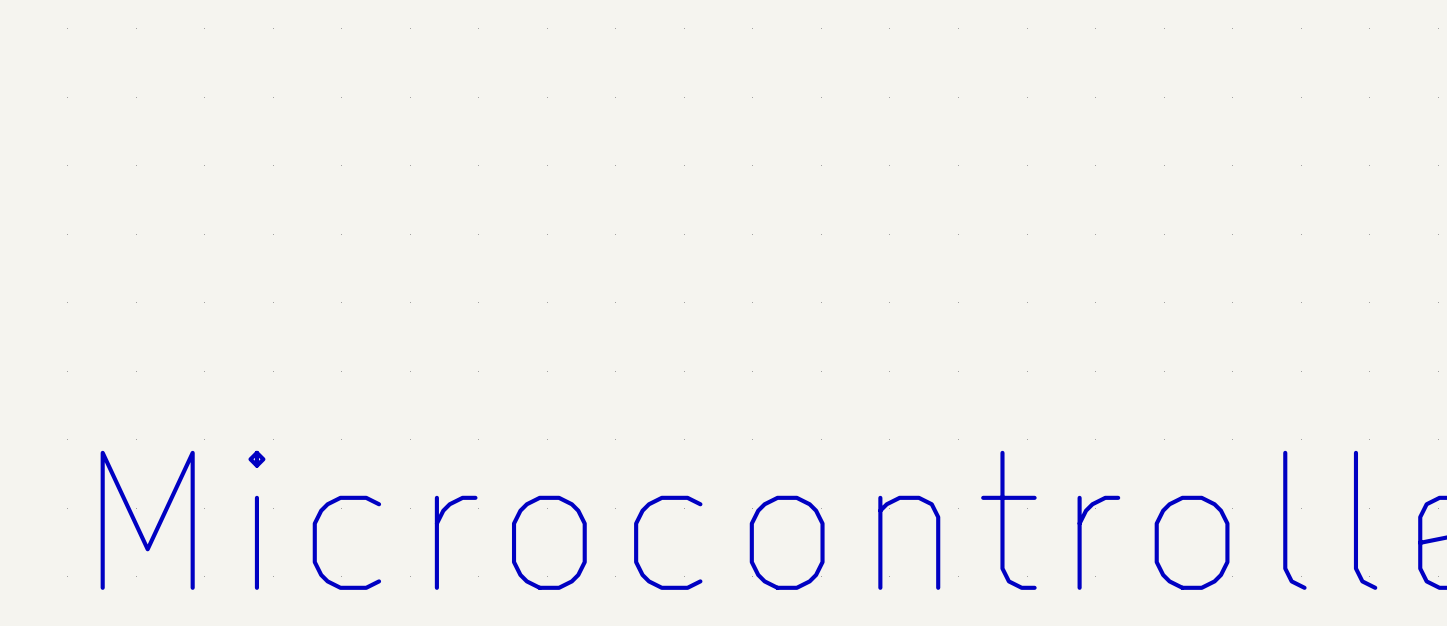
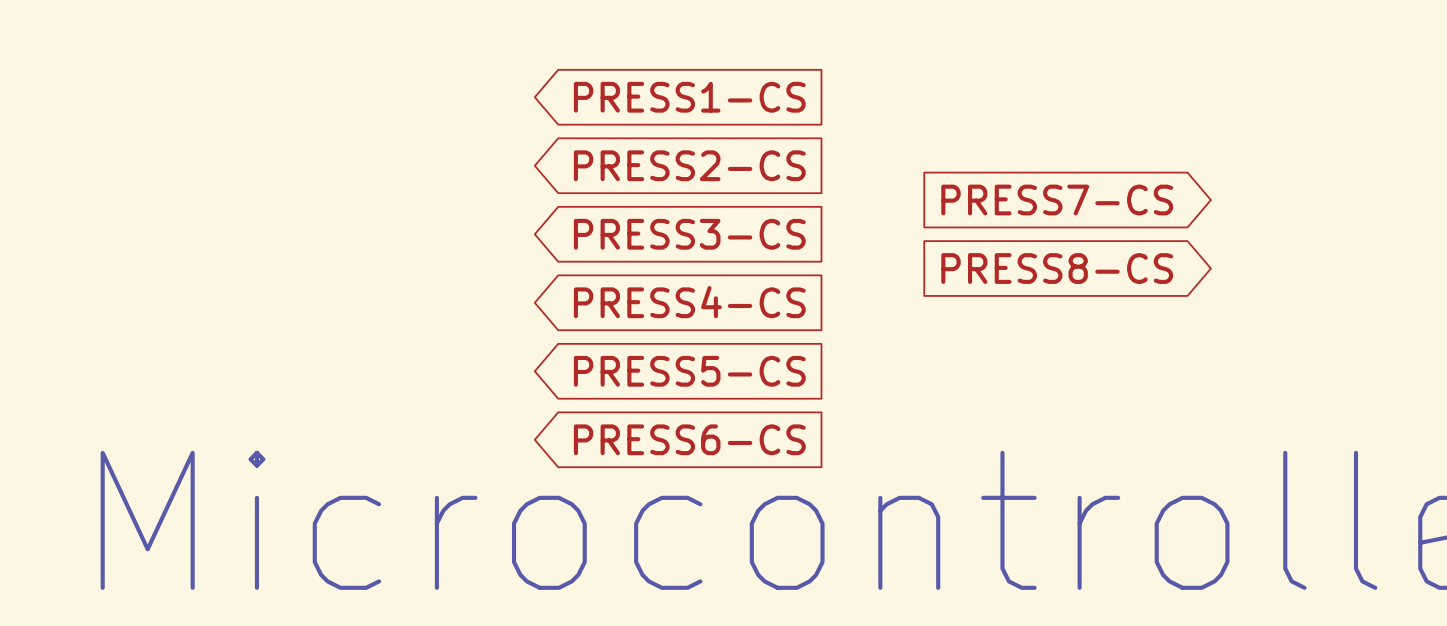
global label: none -> PRESS1-CS (689, 97)
global label: none -> PRESS2-CS (689, 165)
global label: none -> PRESS7-CS (1057, 200)
global label: none -> PRESS3-CS (689, 234)
global label: none -> PRESS8-CS (1057, 268)
global label: none -> PRESS4-CS (689, 302)
global label: none -> PRESS5-CS (689, 371)
global label: none -> PRESS6-CS (689, 439)

